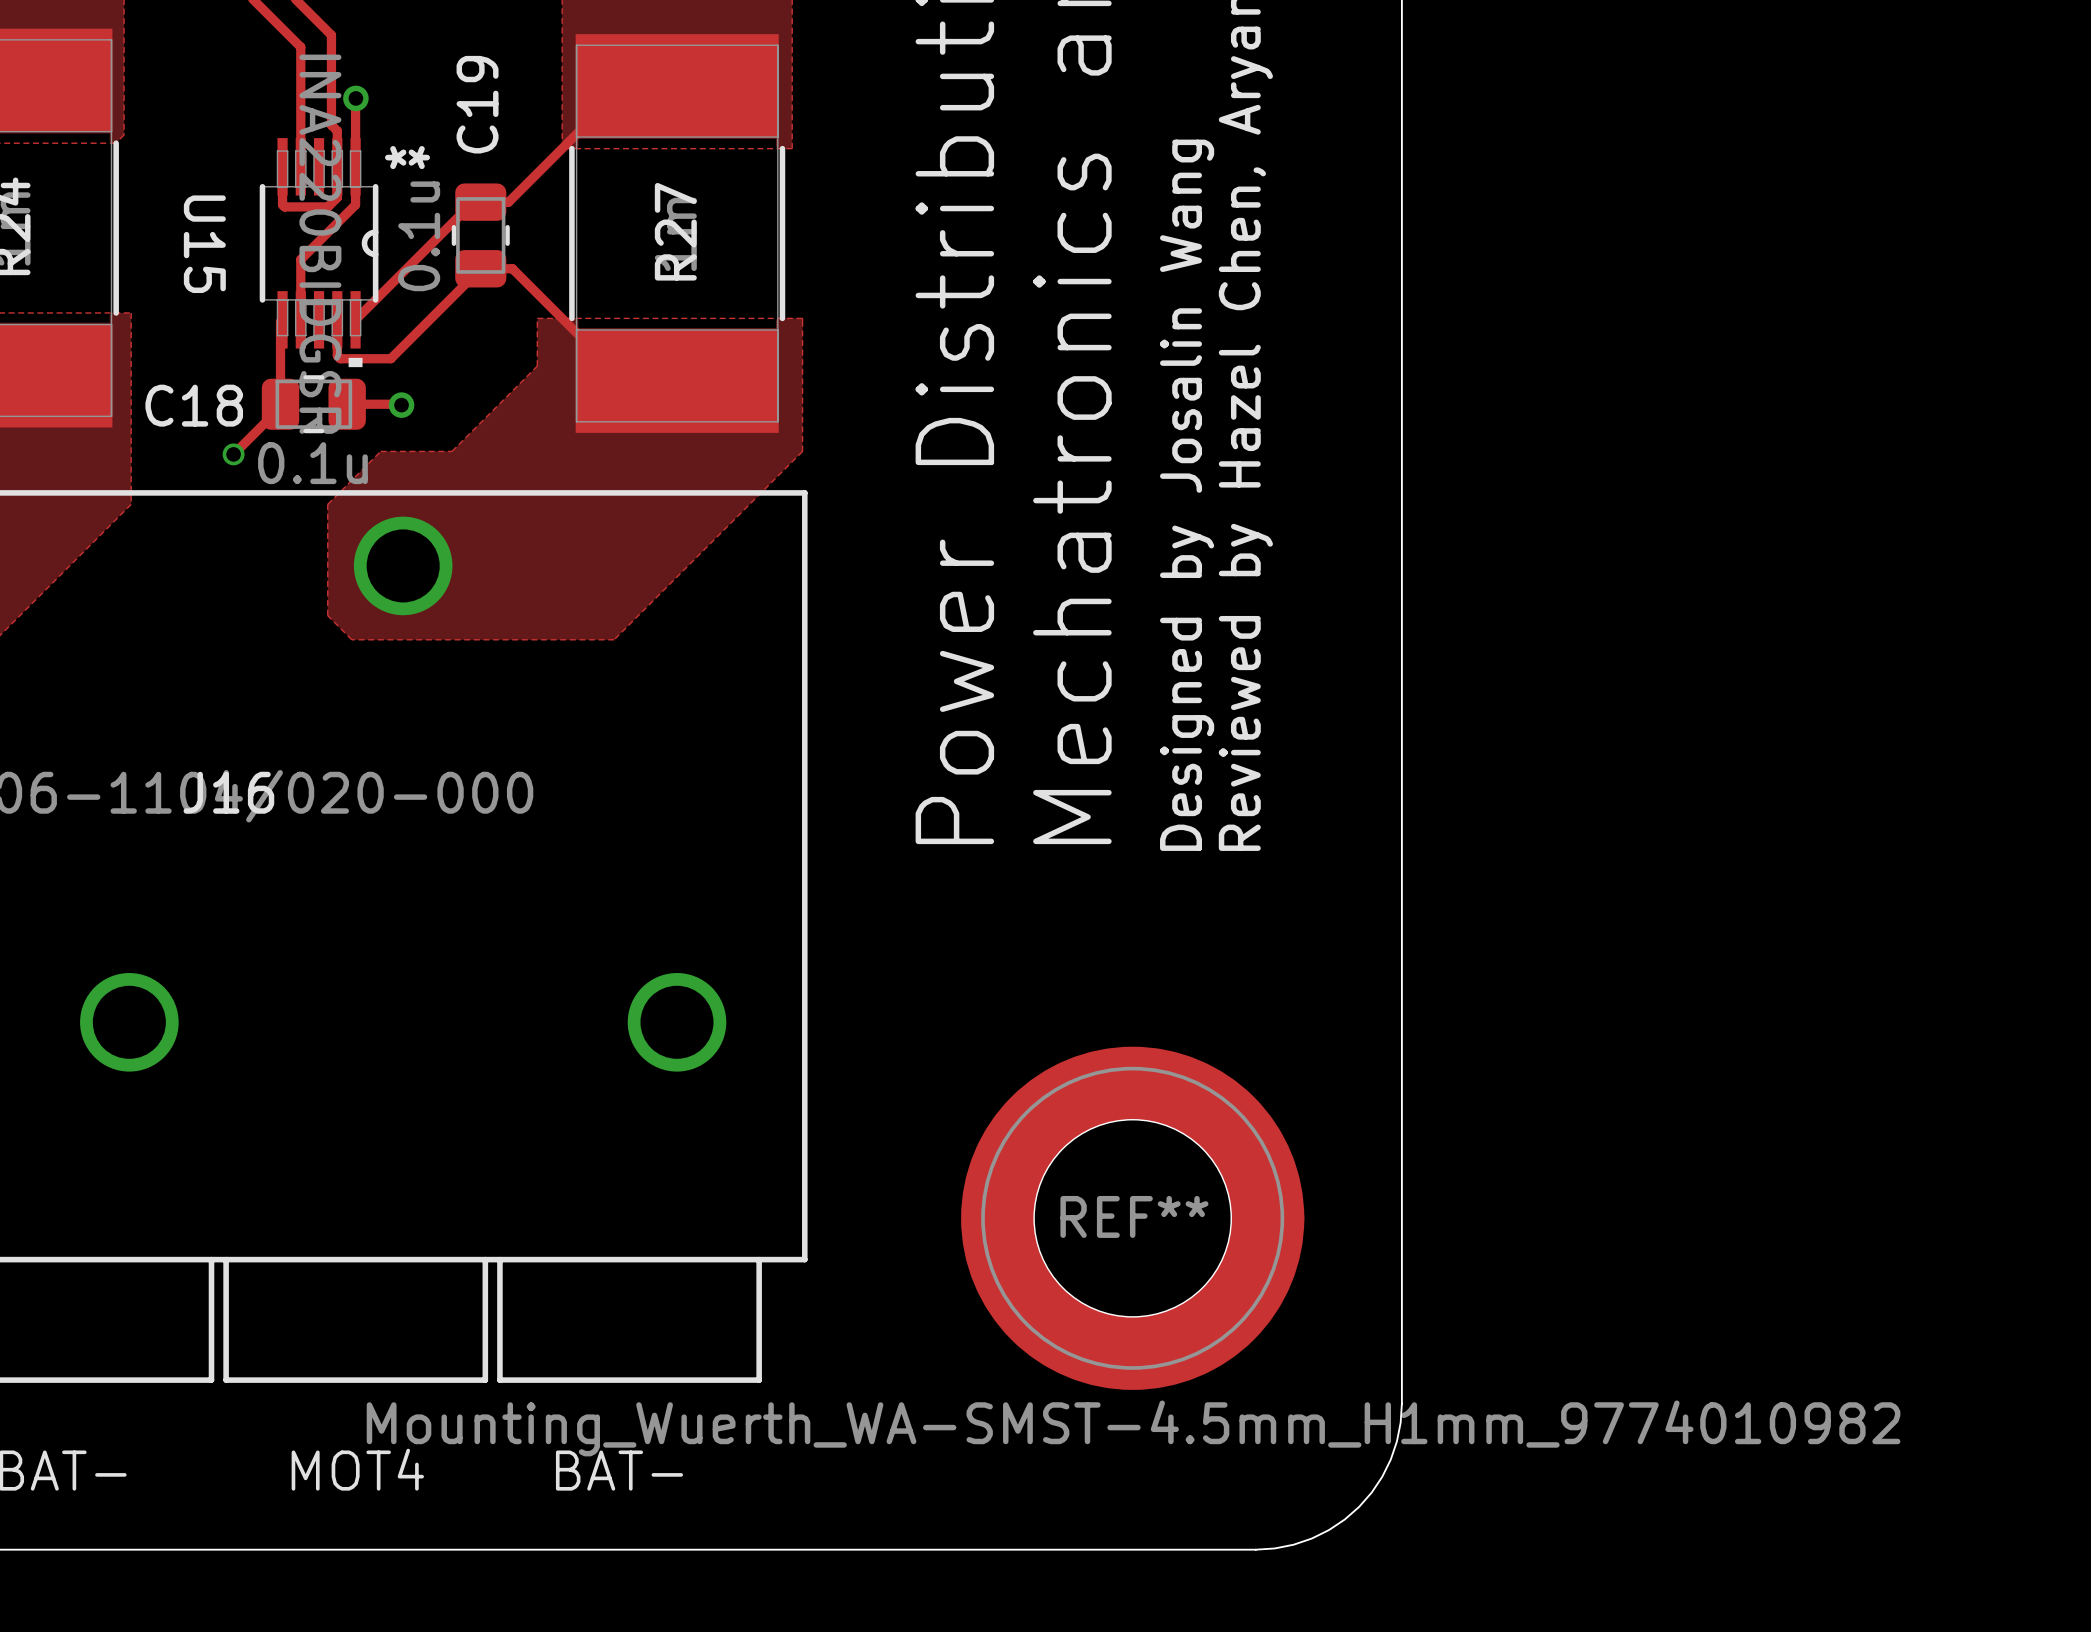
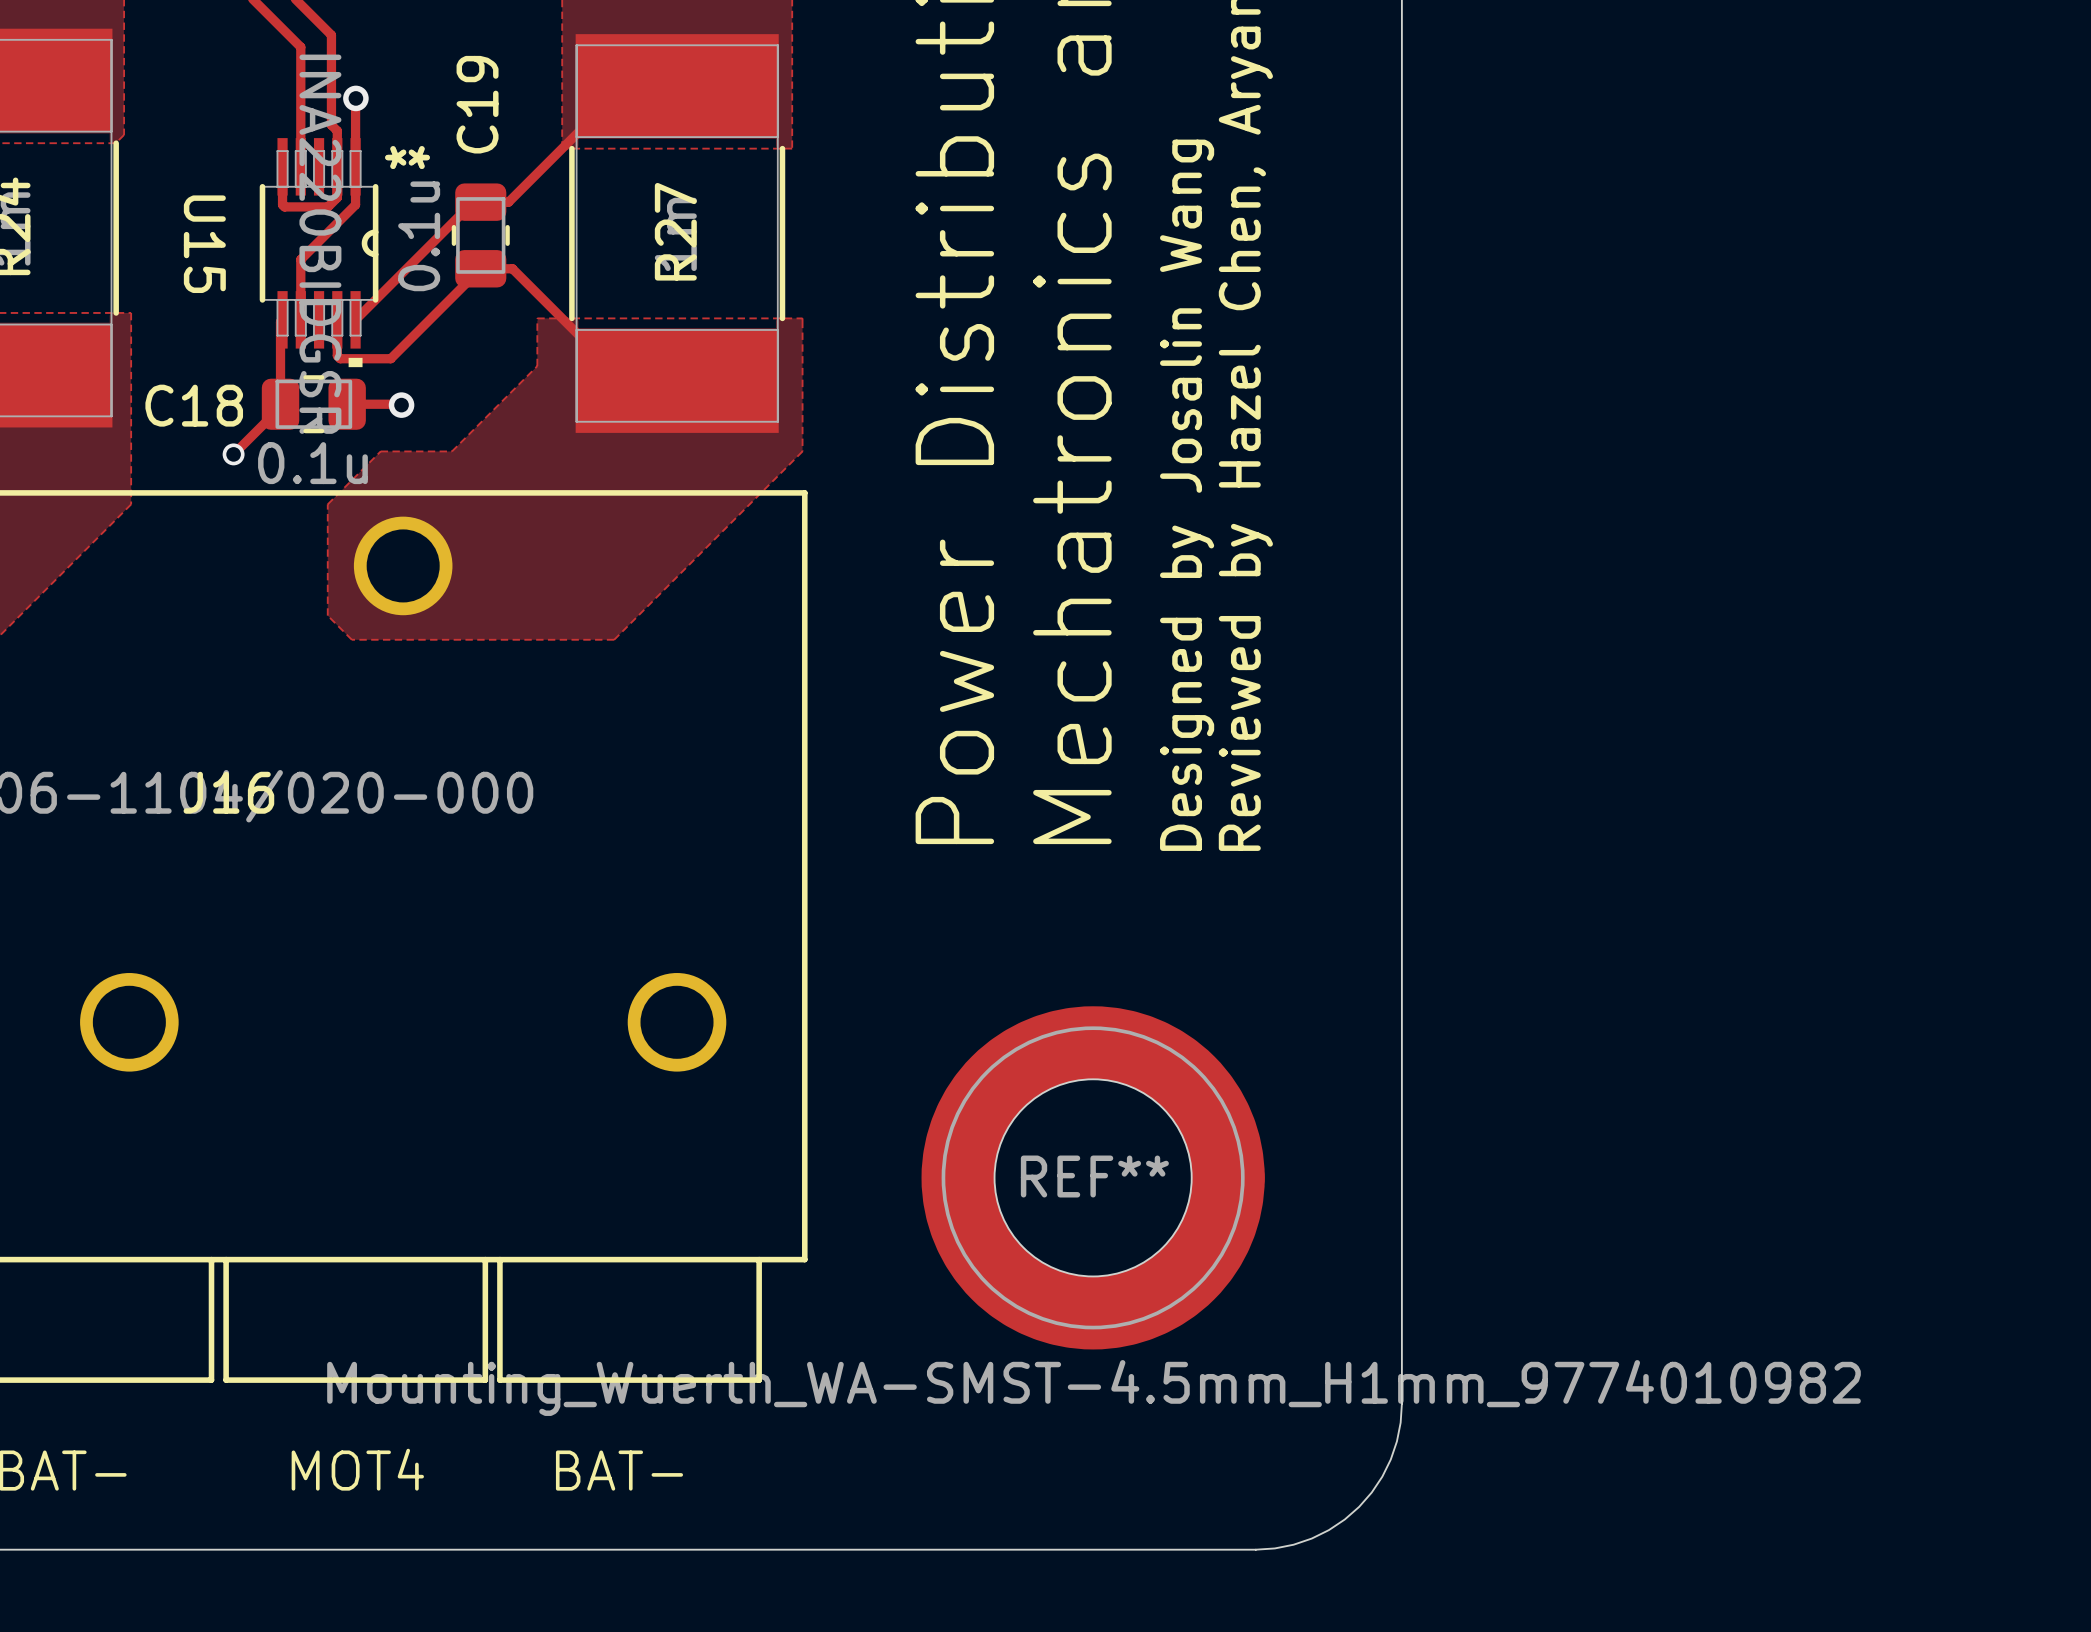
REF** position: (1132, 1218) -> (1093, 1177)

